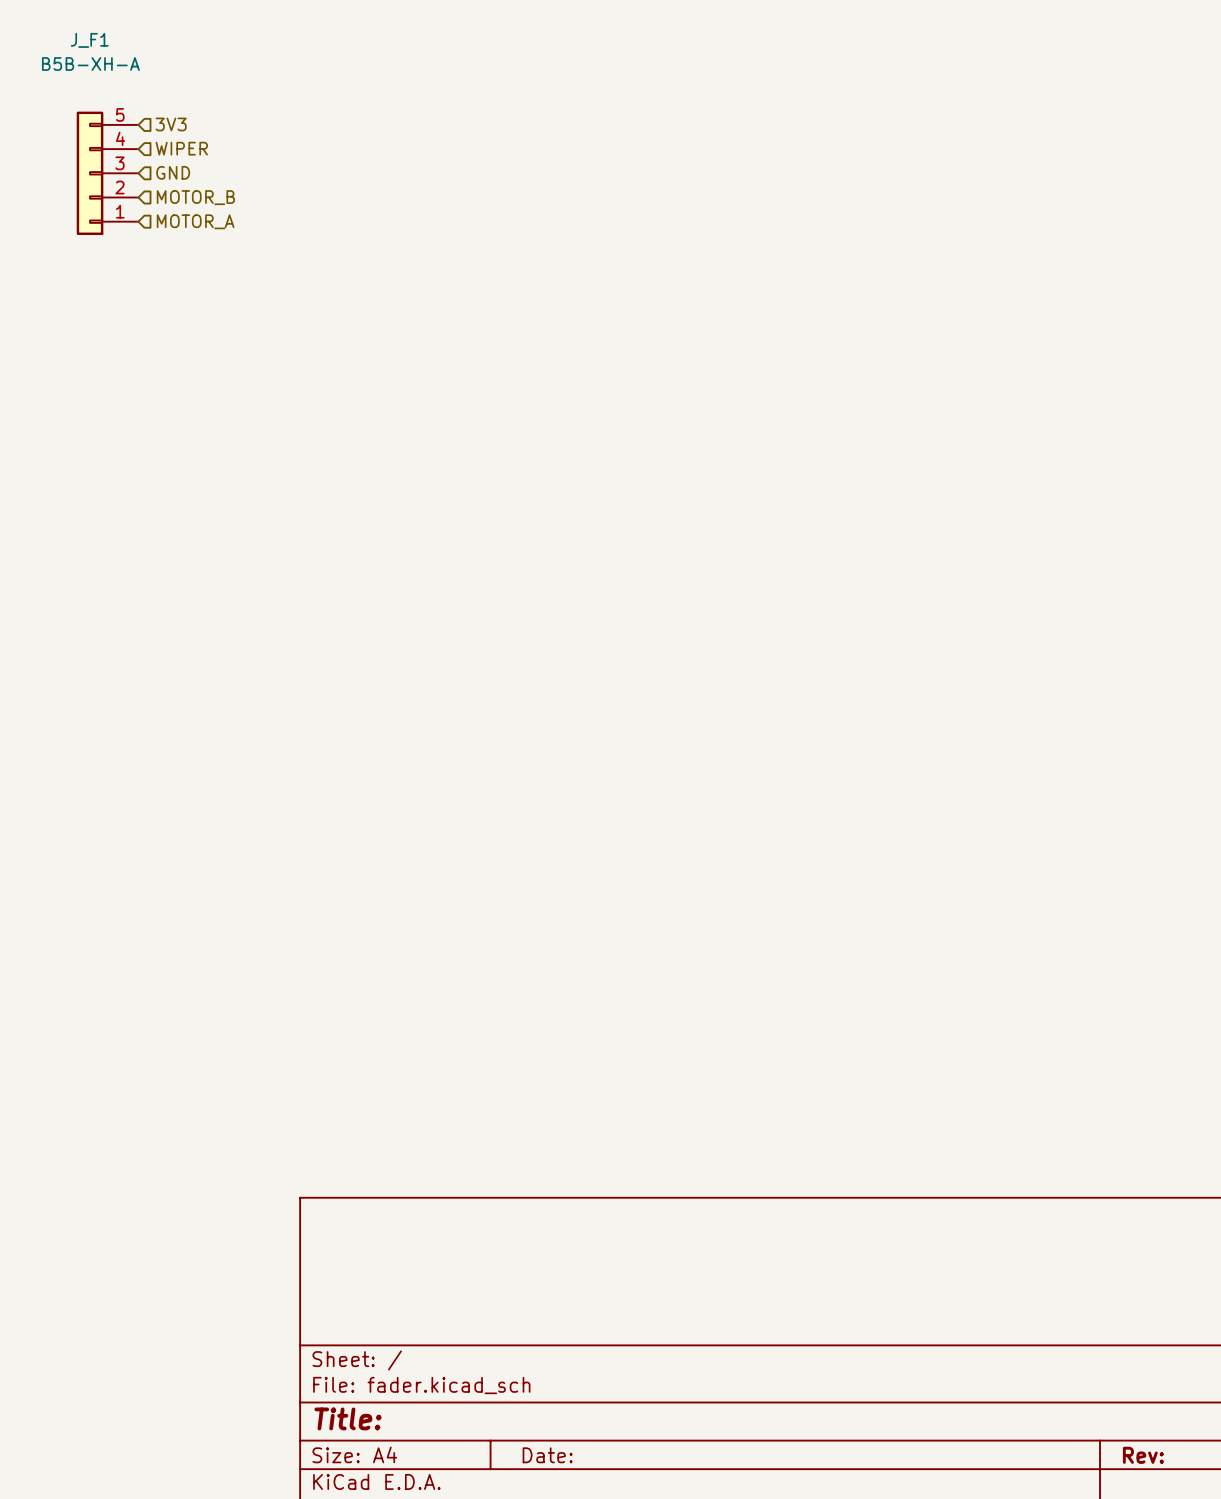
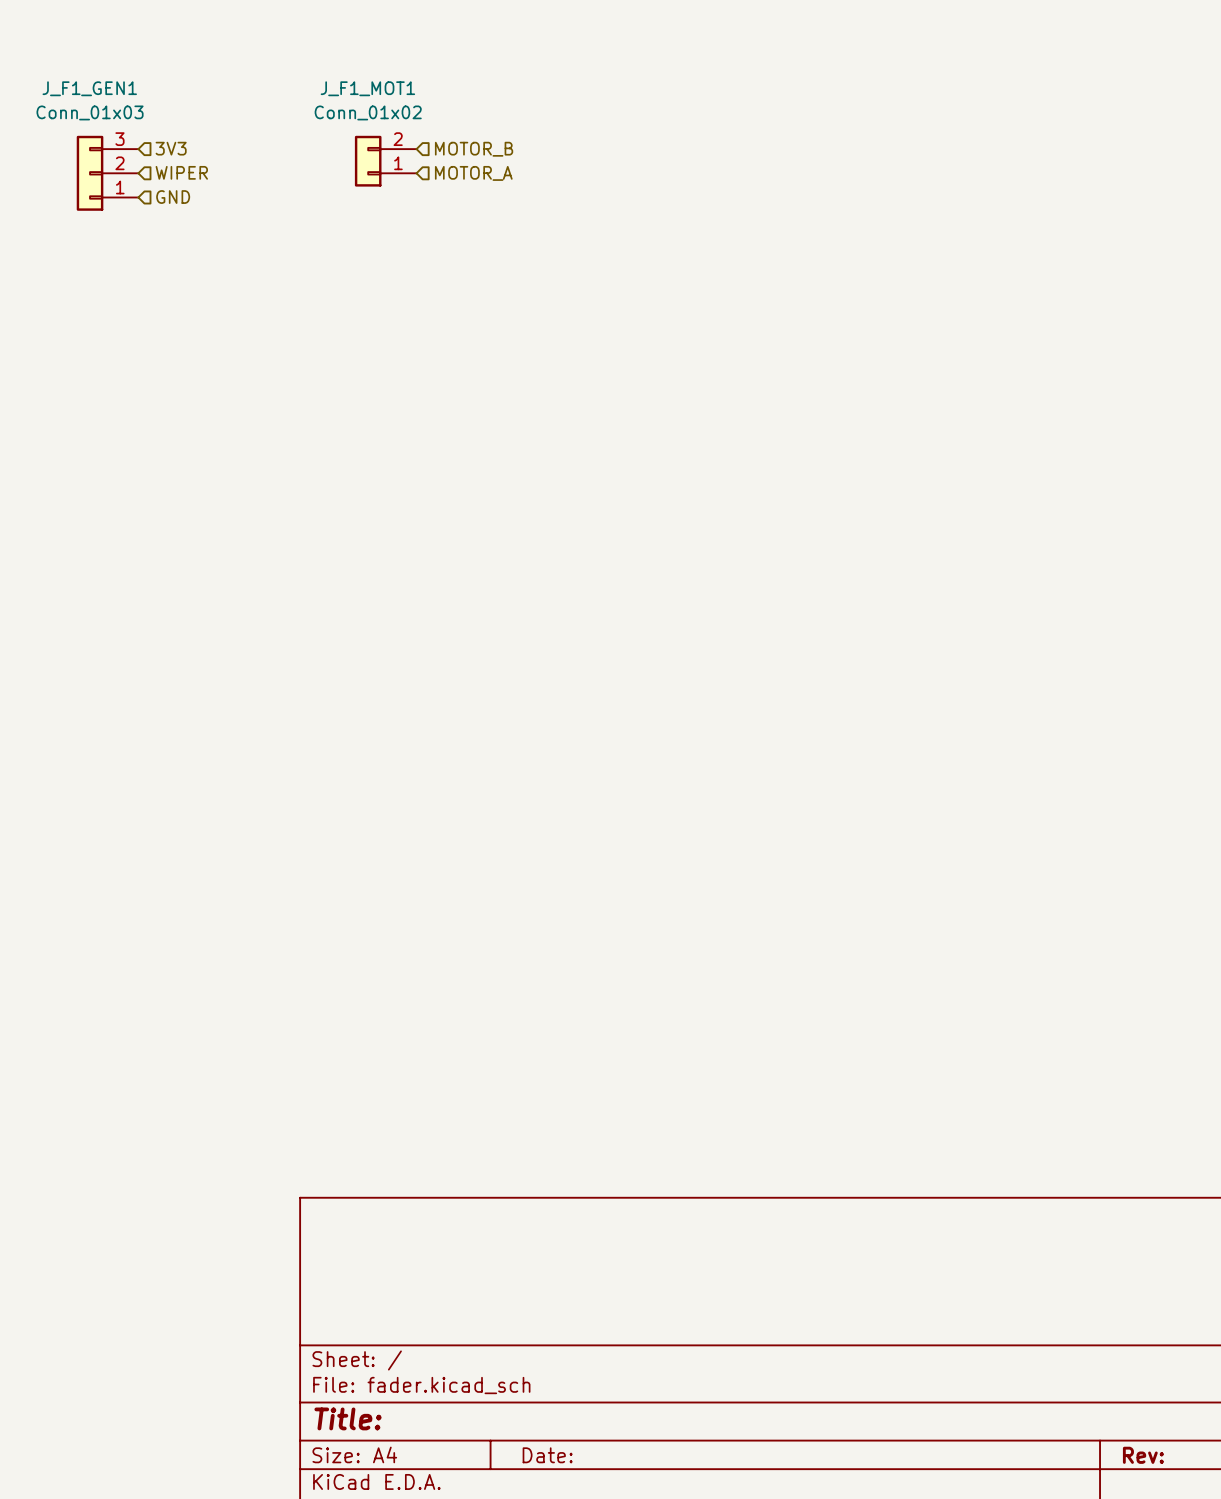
hierarchical label: 3V3 (171, 124) -> none
hierarchical label: WIPER (181, 148) -> 3V3 (171, 148)
hierarchical label: none -> MOTOR_B (474, 149)
J_F1_MOT1: none -> Conn_01x02 (385, 161)
hierarchical label: GND (173, 172) -> WIPER (181, 172)
J_F1: B5B-XH-A (107, 173) -> none
J_F1_GEN1: none -> Conn_01x03 (107, 173)
hierarchical label: none -> MOTOR_A (473, 173)
hierarchical label: MOTOR_B (195, 197) -> GND (173, 197)
hierarchical label: MOTOR_A (195, 221) -> none

